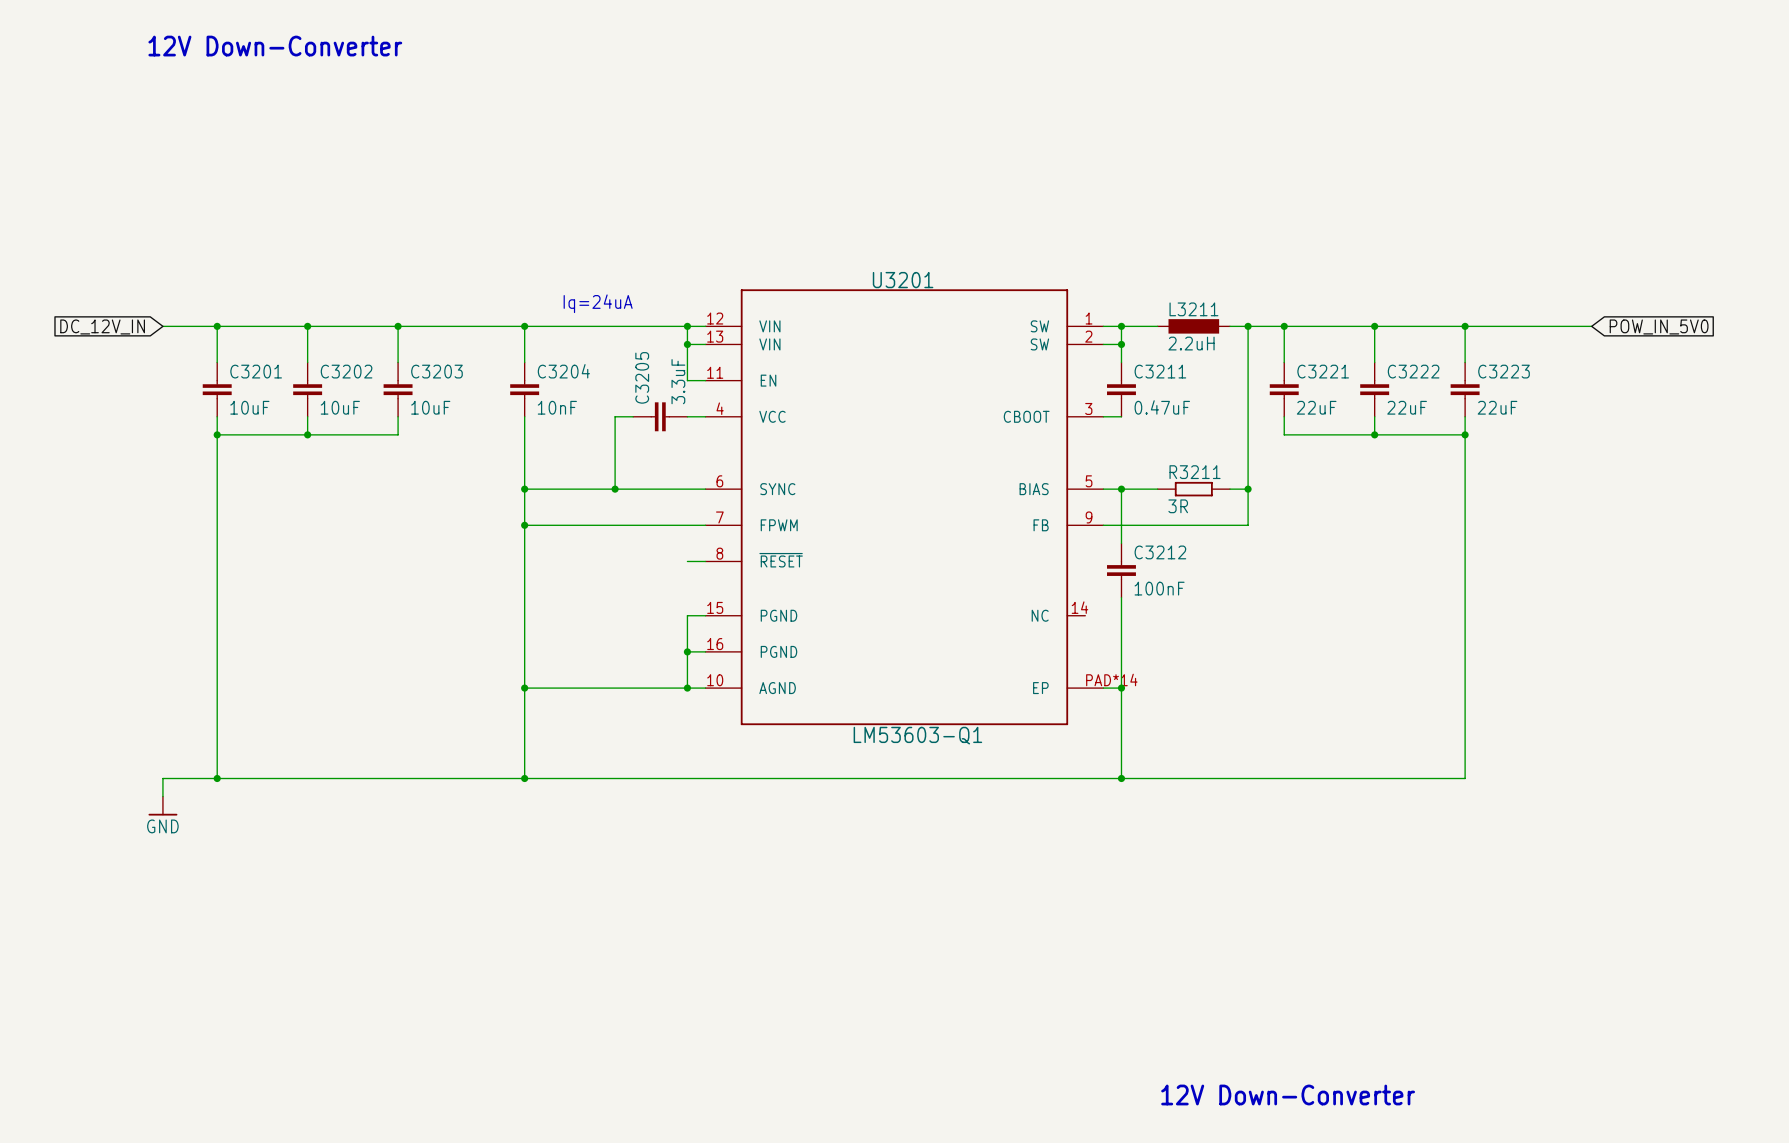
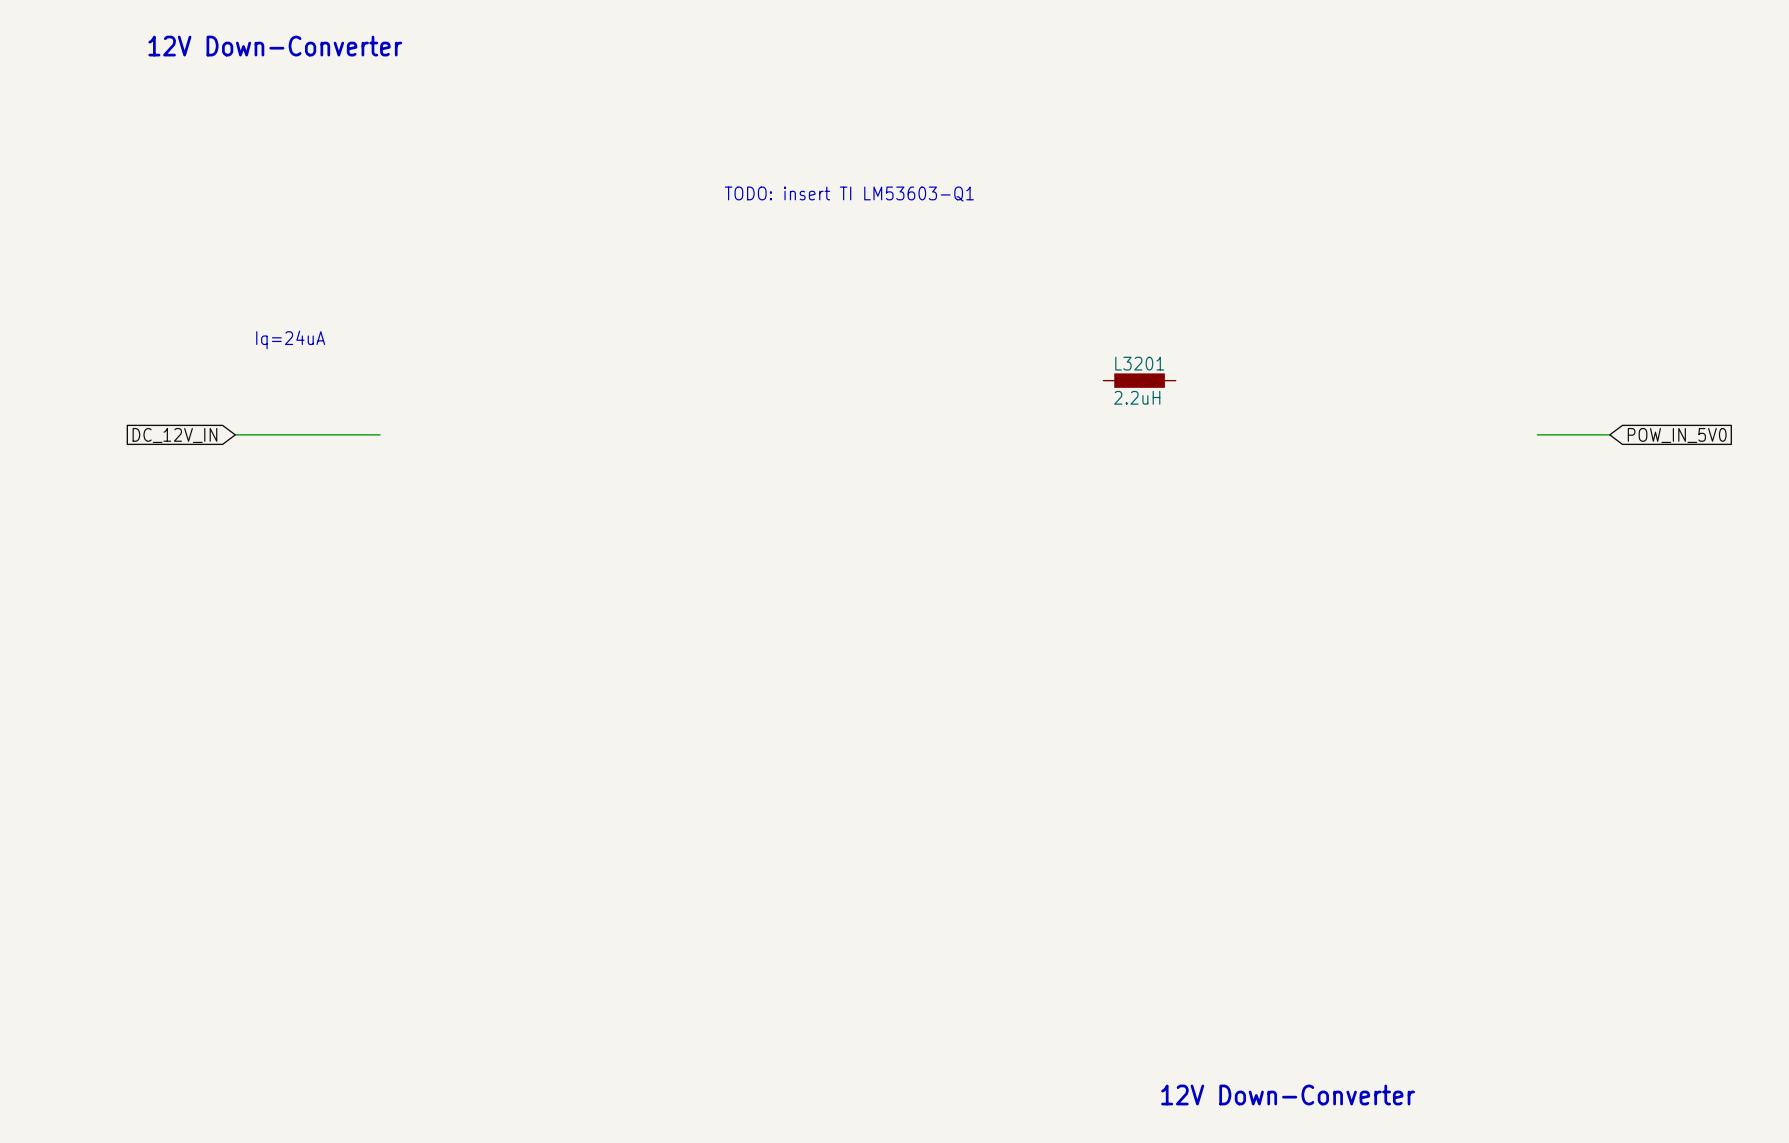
text: none -> TODO: insert TI LM53603-Q1 (849, 194)
text: Iq=24uA (598, 303) -> none
global label position: DC_12V_IN (102, 326) -> DC_12V_IN (174, 435)
wire: (162, 326) (705, 326) -> none
wire: (217, 326) (217, 362) -> none
junction: (217, 326) -> none
wire: (307, 326) (307, 362) -> none
junction: (307, 326) -> none
wire: (398, 326) (398, 362) -> none
junction: (398, 326) -> none
wire: (524, 326) (524, 362) -> none
junction: (524, 326) -> none
wire: (687, 326) (687, 380) (705, 380) -> none
junction: (687, 326) -> none
wire: (1103, 326) (1157, 326) -> none
wire: (1121, 326) (1121, 362) -> none
junction: (1121, 326) -> none
L3211: 2.2uH (1193, 326) -> none
wire: (1229, 326) (1591, 326) -> none
wire: (1248, 326) (1248, 525) (1103, 525) -> none
junction: (1248, 326) -> none
wire: (1284, 326) (1284, 362) -> none
junction: (1284, 326) -> none
wire: (1374, 326) (1374, 362) -> none
junction: (1374, 326) -> none
wire: (1465, 326) (1465, 362) -> none
junction: (1465, 326) -> none
global label position: POW_IN_5V0 (1659, 326) -> POW_IN_5V0 (1677, 435)
text: none -> Iq=24uA (290, 339)
wire: (687, 344) (705, 344) -> none
junction: (687, 344) -> none
wire: (1103, 344) (1121, 344) -> none
junction: (1121, 344) -> none
L3201: none -> 2.2uH (1139, 380)
C3201: 10uF (217, 389) -> none
C3202: 10uF (307, 389) -> none
C3203: 10uF (398, 389) -> none
C3204: 10nF (524, 389) -> none
C3211: 0.47uF (1121, 389) -> none
C3221: 22uF (1284, 389) -> none
C3222: 22uF (1374, 389) -> none
C3223: 22uF (1465, 389) -> none
wire: (217, 416) (217, 778) -> none
wire: (307, 416) (307, 434) -> none
wire: (398, 416) (398, 434) (379, 434) -> none
wire: (524, 416) (524, 778) -> none
wire: (633, 416) (615, 416) (615, 489) -> none
C3205: 3.3uF (660, 416) -> none
wire: (687, 416) (705, 416) -> none
wire: (1103, 416) (1121, 416) -> none
wire: (1284, 416) (1284, 434) (1465, 434) -> none
wire: (1374, 416) (1374, 434) -> none
wire: (1465, 416) (1465, 778) (162, 778) (162, 796) -> none
wire: (217, 434) (235, 434) -> none
junction: (217, 434) -> none
junction: (307, 434) -> none
junction: (1374, 434) -> none
junction: (1465, 434) -> none
wire: none -> (1537, 434) (1609, 434)
wire: (524, 489) (705, 489) -> none
junction: (524, 489) -> none
junction: (615, 489) -> none
wire: (1103, 489) (1157, 489) -> none
wire: (1121, 489) (1121, 543) -> none
junction: (1121, 489) -> none
R3211: 3R (1193, 489) -> none
wire: (1229, 489) (1248, 489) -> none
junction: (1248, 489) -> none
U3201: LM53603-Q1 (904, 507) -> none
wire: (524, 525) (705, 525) -> none
junction: (524, 525) -> none
wire: (687, 561) (705, 561) -> none
C3212: 100nF (1121, 570) -> none
wire: (1121, 597) (1121, 778) -> none
wire: (705, 615) (687, 615) (687, 688) -> none
wire: (687, 651) (705, 651) -> none
junction: (687, 651) -> none
wire: (524, 688) (705, 688) -> none
junction: (524, 688) -> none
junction: (687, 688) -> none
wire: (1103, 688) (1121, 688) -> none
junction: (1121, 688) -> none
junction: (217, 778) -> none
junction: (524, 778) -> none
junction: (1121, 778) -> none
power symbol: GND (162, 806) -> none

